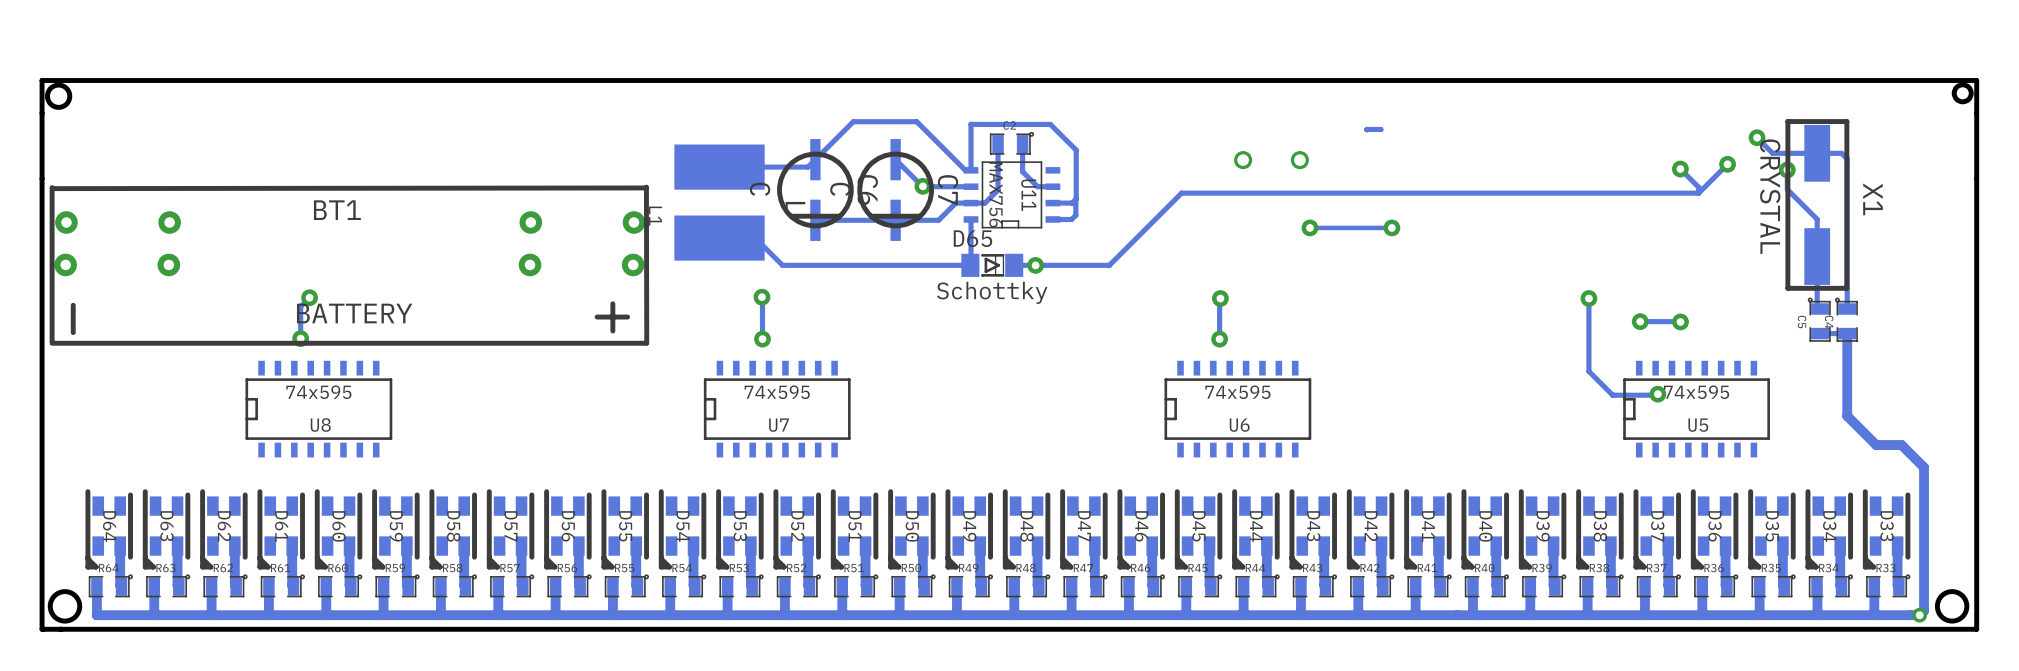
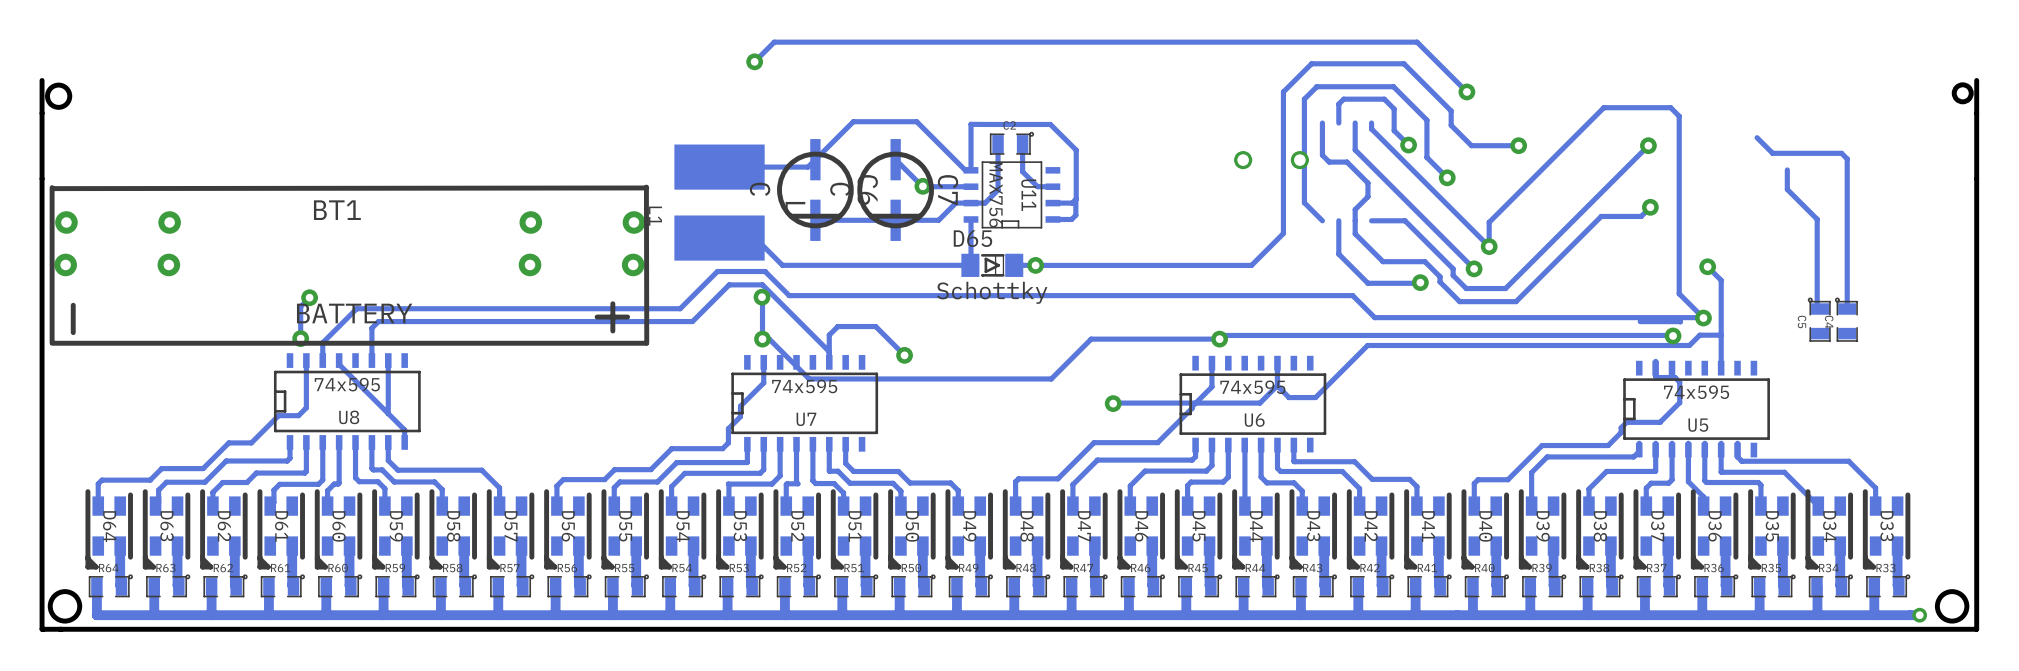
track: none -> (754, 61) (774, 42) (1417, 42) (1466, 91)
via: none -> (754, 61)
board edge: (1976, 80) (42, 80) -> none
via: none -> (1466, 91)
track: none -> (1322, 123) (1322, 155) (1329, 162) (1346, 162) (1367, 183) (1367, 196) (1355, 209) (1355, 233) (1383, 261) (1424, 261) (1440, 276) (1440, 281) (1459, 301) (1516, 301) (1601, 216) (1641, 216) (1650, 207)
track: none -> (1338, 123) (1338, 104) (1343, 99) (1384, 99) (1394, 109) (1394, 130) (1408, 145)
track: none -> (1355, 123) (1355, 149) (1474, 268)
track: none -> (1371, 123) (1371, 128) (1489, 246) (1489, 222) (1603, 107) (1670, 107) (1679, 116) (1679, 293) (1703, 318)
track: (1380, 129) (1366, 129) -> none
via: (1757, 137) -> none
via: none -> (1408, 145)
via: none -> (1518, 145)
track: none -> (1648, 145) (1505, 288) (1466, 288) (1453, 275) (1453, 268) (1405, 220) (1371, 220)
via: none -> (1648, 145)
track: (1727, 164) (1698, 193) -> none
via: (1727, 164) -> none
track: (1680, 169) (1698, 187) (1698, 193) -> none
via: (1680, 169) -> none
via: (1787, 169) -> none
track: none -> (1447, 177) (1426, 157) (1426, 120) (1393, 86) (1316, 86) (1304, 99) (1304, 202) (1322, 220)
via: none -> (1447, 177)
track: (1698, 193) (1181, 193) (1109, 265) -> (1518, 145) (1471, 145) (1451, 125) (1451, 110) (1404, 63) (1311, 63) (1283, 91) (1283, 233) (1251, 265) (1109, 265)
X1: CRYSTAL (1817, 204) -> none
via: none -> (1650, 207)
track: none -> (1338, 220) (1338, 254) (1367, 283) (1420, 282)
via: (1309, 227) -> none
track: (1391, 227) (1309, 227) -> none
via: (1391, 227) -> none
via: none -> (1489, 246)
track: none -> (1707, 266) (1721, 280) (1721, 361)
via: none -> (1707, 266)
via: none -> (1474, 268)
via: none -> (1420, 282)
track: (1589, 297) (1588, 371) (1612, 395) (1657, 394) -> none
track: (1220, 298) (1219, 339) -> none
via: (1220, 298) -> none
via: (1588, 298) -> none
track: none -> (1703, 317) (1374, 317) (1352, 295) (789, 295) (765, 271) (717, 271) (680, 308) (356, 308) (322, 342) (322, 360)
via: none -> (1703, 318)
via: (1640, 321) -> none
via: (1680, 321) -> none
track: (1820, 333) (1847, 333) (1847, 416) (1876, 445) (1901, 445) (1924, 467) (1924, 610) (1919, 615) -> none
track: none -> (1673, 335) (1223, 335) (1219, 339) (1091, 339) (1051, 378) (809, 378) (769, 339) (762, 339)
via: none -> (1673, 335)
track: none -> (1721, 335) (1699, 335) (1689, 345) (1367, 345) (1315, 397) (1289, 397) (1277, 385) (1277, 363)
track: none -> (829, 351) (762, 284) (729, 284) (692, 321) (378, 321) (371, 328) (371, 360)
track: none -> (904, 355) (875, 326) (837, 326) (829, 335) (829, 362)
via: none -> (904, 355)
track: none -> (306, 360) (306, 407) (298, 415) (278, 415) (251, 442) (228, 442) (203, 468) (161, 468) (150, 480) (102, 480) (98, 483) (98, 506)
track: none -> (339, 360) (339, 364) (404, 430) (404, 442)
track: none -> (388, 360) (388, 413)
track: none -> (1655, 361) (1656, 377) (1675, 377) (1679, 382) (1679, 402) (1660, 422) (1626, 422) (1621, 427) (1621, 432) (1608, 445) (1542, 445) (1507, 479) (1478, 479) (1474, 483) (1474, 506)
track: none -> (763, 362) (763, 382) (740, 406) (740, 416) (728, 428) (728, 442) (722, 448) (671, 448) (650, 469) (614, 469) (604, 479) (563, 479) (556, 486) (556, 506)
track: none -> (1211, 363) (1211, 386) (1157, 442) (1094, 442) (1057, 478) (1018, 478) (1015, 481) (1015, 506)
track: none -> (1277, 385) (1259, 403) (1113, 403)
via: (1657, 394) -> none
via: none -> (1113, 403)
U8 position: (318, 409) -> (347, 401)
U7 position: (777, 409) -> (804, 403)
U6 position: (1237, 409) -> (1252, 404)
track: none -> (290, 442) (290, 458) (287, 461) (226, 461) (205, 482) (166, 482) (158, 490) (158, 503) (155, 506)
track: none -> (306, 442) (304, 473) (256, 473) (246, 482) (222, 482) (212, 492) (212, 506)
track: none -> (322, 442) (322, 480) (318, 484) (279, 484) (273, 490) (273, 502) (270, 506)
track: none -> (339, 442) (339, 483) (334, 484) (327, 490) (327, 506)
track: none -> (355, 442) (355, 477) (359, 481) (378, 481) (384, 488) (384, 506)
track: none -> (371, 442) (373, 469) (382, 469) (394, 481) (434, 481) (442, 489) (442, 506)
track: none -> (388, 442) (388, 460) (397, 470) (481, 470) (499, 487) (499, 506)
track: none -> (1639, 443) (1639, 451) (1633, 456) (1547, 456) (1531, 472) (1531, 506)
track: none -> (1655, 443) (1655, 471) (1606, 471) (1588, 489) (1588, 506)
track: none -> (1672, 443) (1672, 479) (1668, 483) (1651, 483) (1646, 488) (1646, 506)
track: none -> (1688, 443) (1688, 481) (1703, 496) (1703, 506)
track: none -> (1704, 443) (1704, 480) (1706, 482) (1758, 482) (1760, 485) (1760, 506)
track: none -> (1721, 443) (1721, 472) (1784, 472) (1818, 506)
track: none -> (1737, 443) (1737, 457) (1741, 461) (1848, 461) (1875, 488) (1875, 506)
track: none -> (747, 444) (746, 462) (676, 462) (657, 481) (619, 481) (614, 487) (614, 506)
track: none -> (763, 444) (763, 469) (760, 473) (684, 473) (671, 486) (671, 506)
track: none -> (780, 444) (780, 475) (771, 484) (728, 484) (728, 506)
track: none -> (796, 444) (797, 483) (786, 484) (786, 506)
track: none -> (812, 444) (812, 480) (815, 483) (834, 483) (843, 493) (843, 506)
track: none -> (829, 444) (829, 471) (837, 471) (850, 483) (893, 483) (900, 491) (900, 506)
track: none -> (845, 444) (845, 463) (853, 471) (898, 471) (910, 483) (950, 483) (958, 490) (958, 506)
track: none -> (1195, 445) (1195, 456) (1192, 460) (1097, 460) (1072, 484) (1072, 506)
track: none -> (1211, 445) (1211, 465) (1206, 471) (1145, 471) (1130, 485) (1130, 506)
track: none -> (1228, 445) (1228, 477) (1223, 482) (1191, 482) (1187, 485) (1187, 506)
track: none -> (1244, 445) (1244, 506)
track: none -> (1261, 445) (1261, 477) (1266, 482) (1294, 482) (1302, 491) (1302, 506)
track: none -> (1277, 445) (1277, 468) (1280, 471) (1342, 471) (1359, 488) (1359, 506)
track: none -> (1293, 445) (1294, 461) (1354, 461) (1372, 479) (1409, 479) (1416, 486) (1416, 506)

